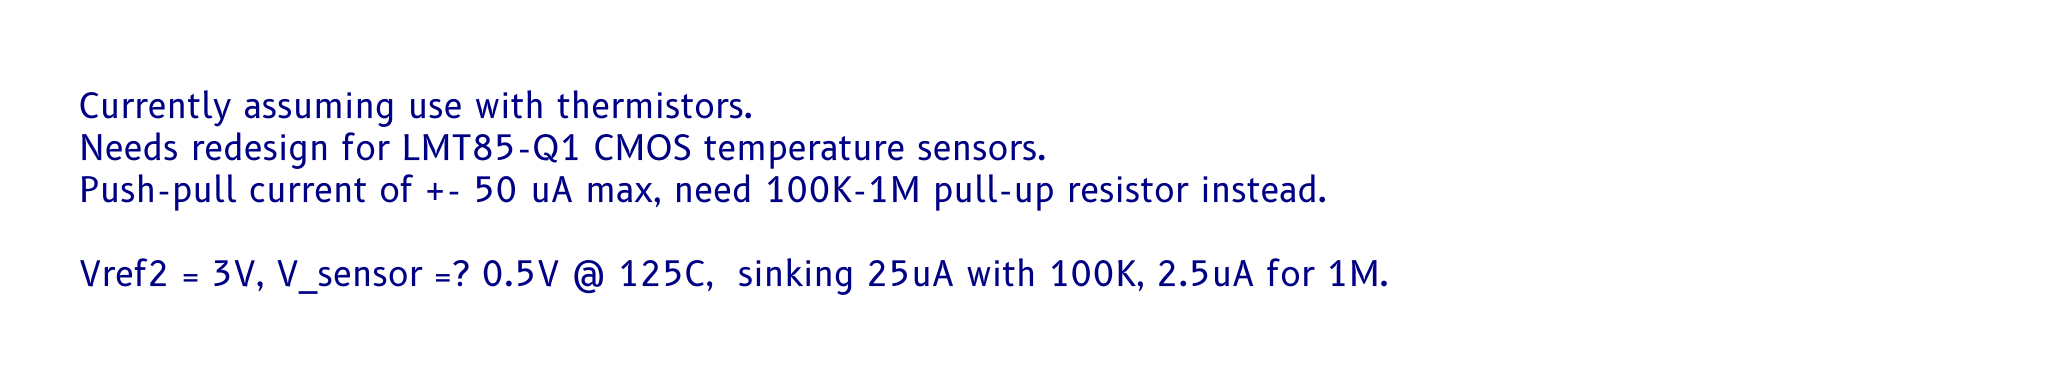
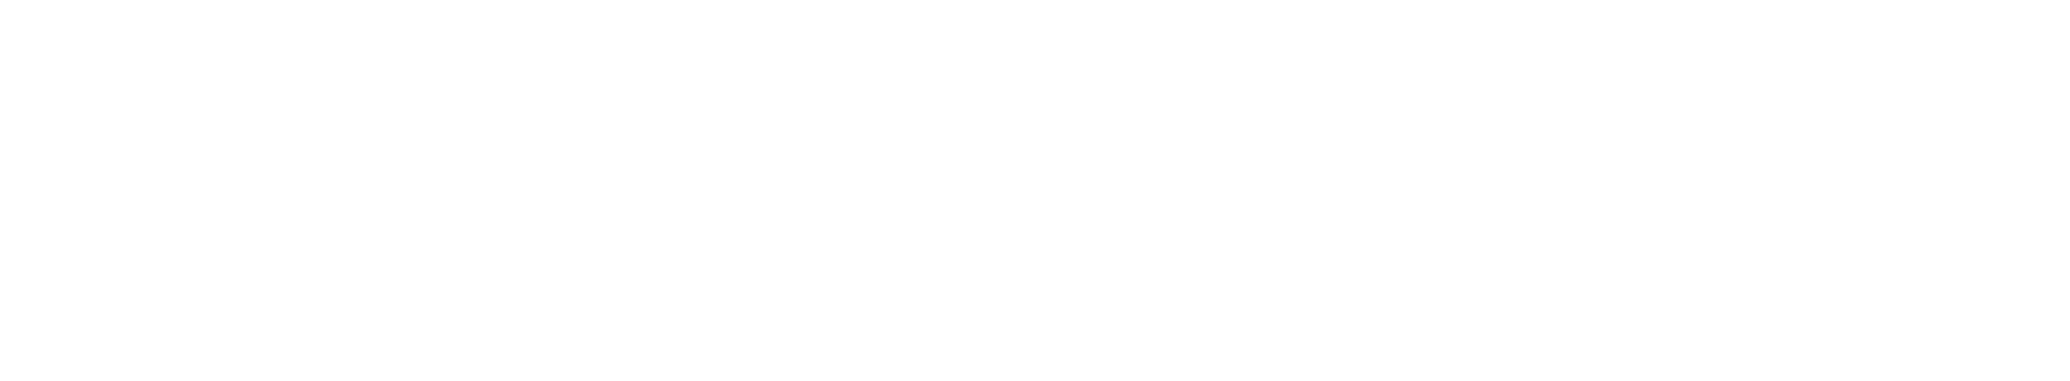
text: Currently assuming use with thermistors. (415, 108) -> none
text: Needs redesign for LMT85-Q1 CMOS temperature sensors. (563, 150) -> none
text: Push-pull current of +- 50 uA max, need 100K-1M pull-up resistor instead. (703, 192) -> none
text: Vref2 = 3V, V_sensor =? 0.5V @ 125C, sinking 25uA with 100K, 2.5uA for 1M. (733, 276) -> none

